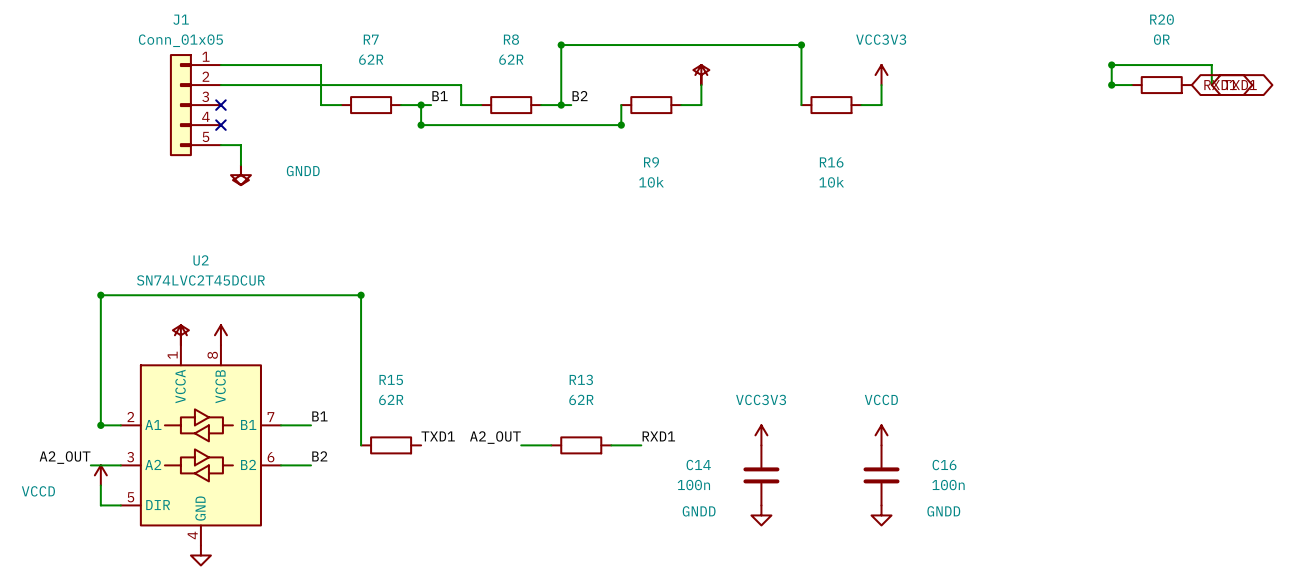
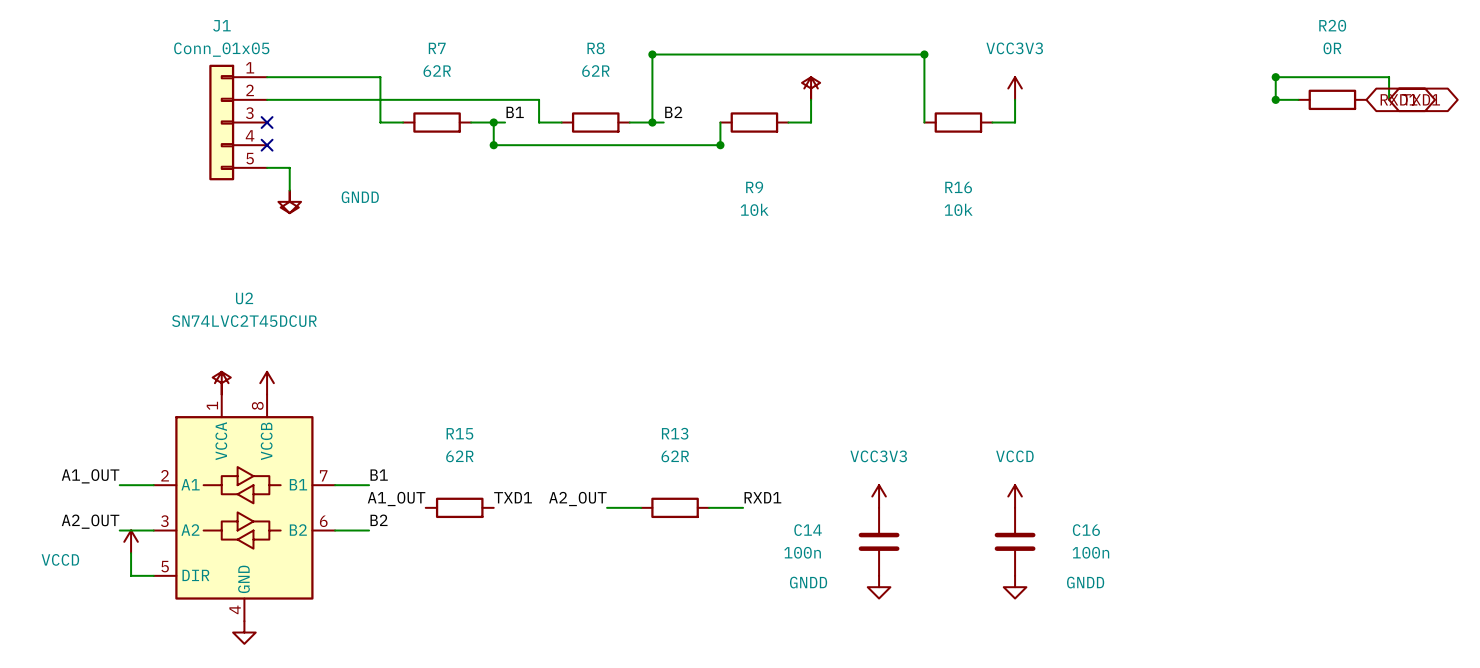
junction: (100, 295) -> none
junction: (361, 295) -> none
label: none -> A1_OUT (90, 476)
wire: (100, 425) (100, 295) (361, 295) (361, 445) -> (131, 485) (119, 485)
junction: (100, 425) -> none
label: none -> A1_OUT (396, 499)

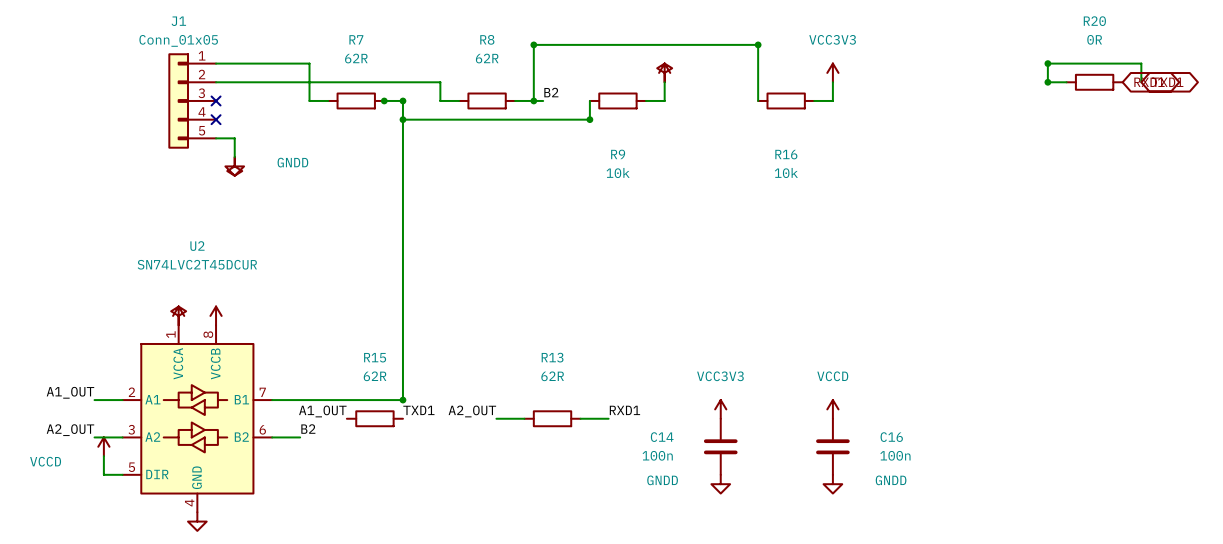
label: B1 (515, 112) -> none
junction: none -> (384, 100)
wire: (493, 122) (505, 122) -> none
wire: none -> (402, 119) (402, 400) (300, 400)
label: B1 (379, 475) -> none
junction: none -> (402, 400)

